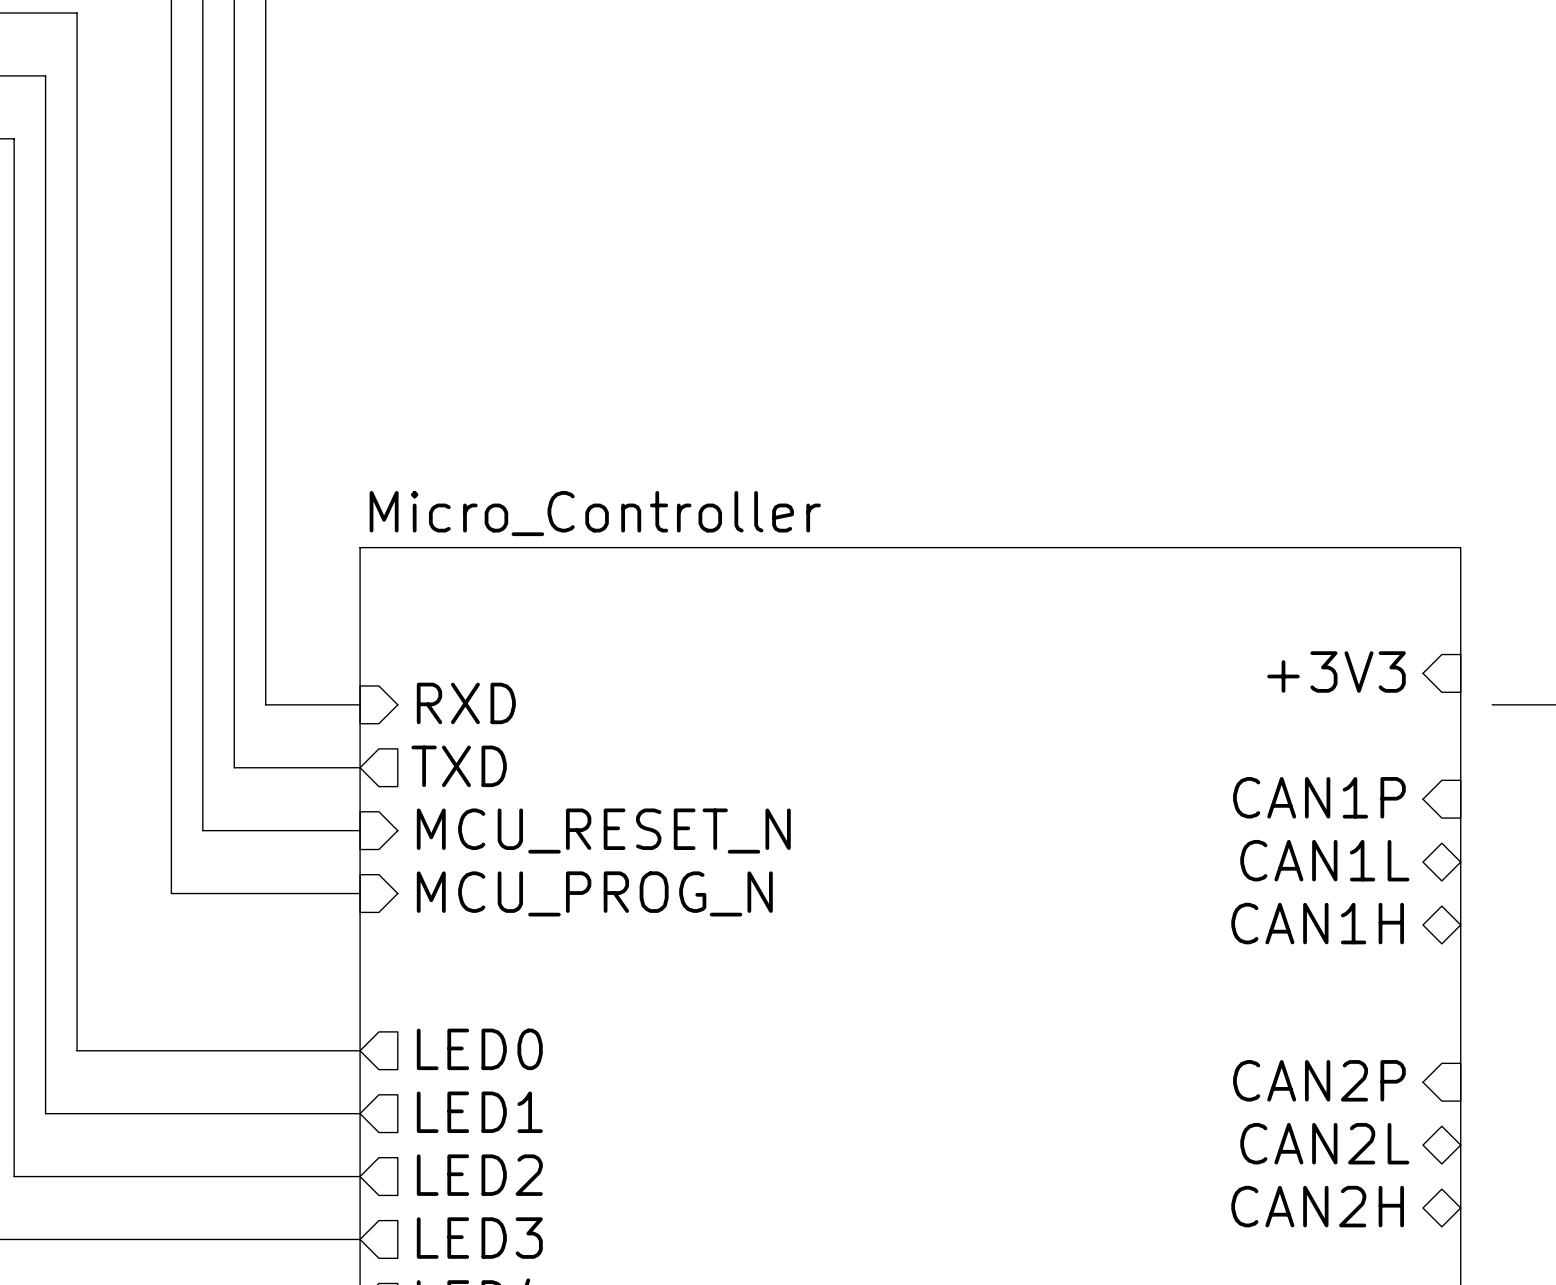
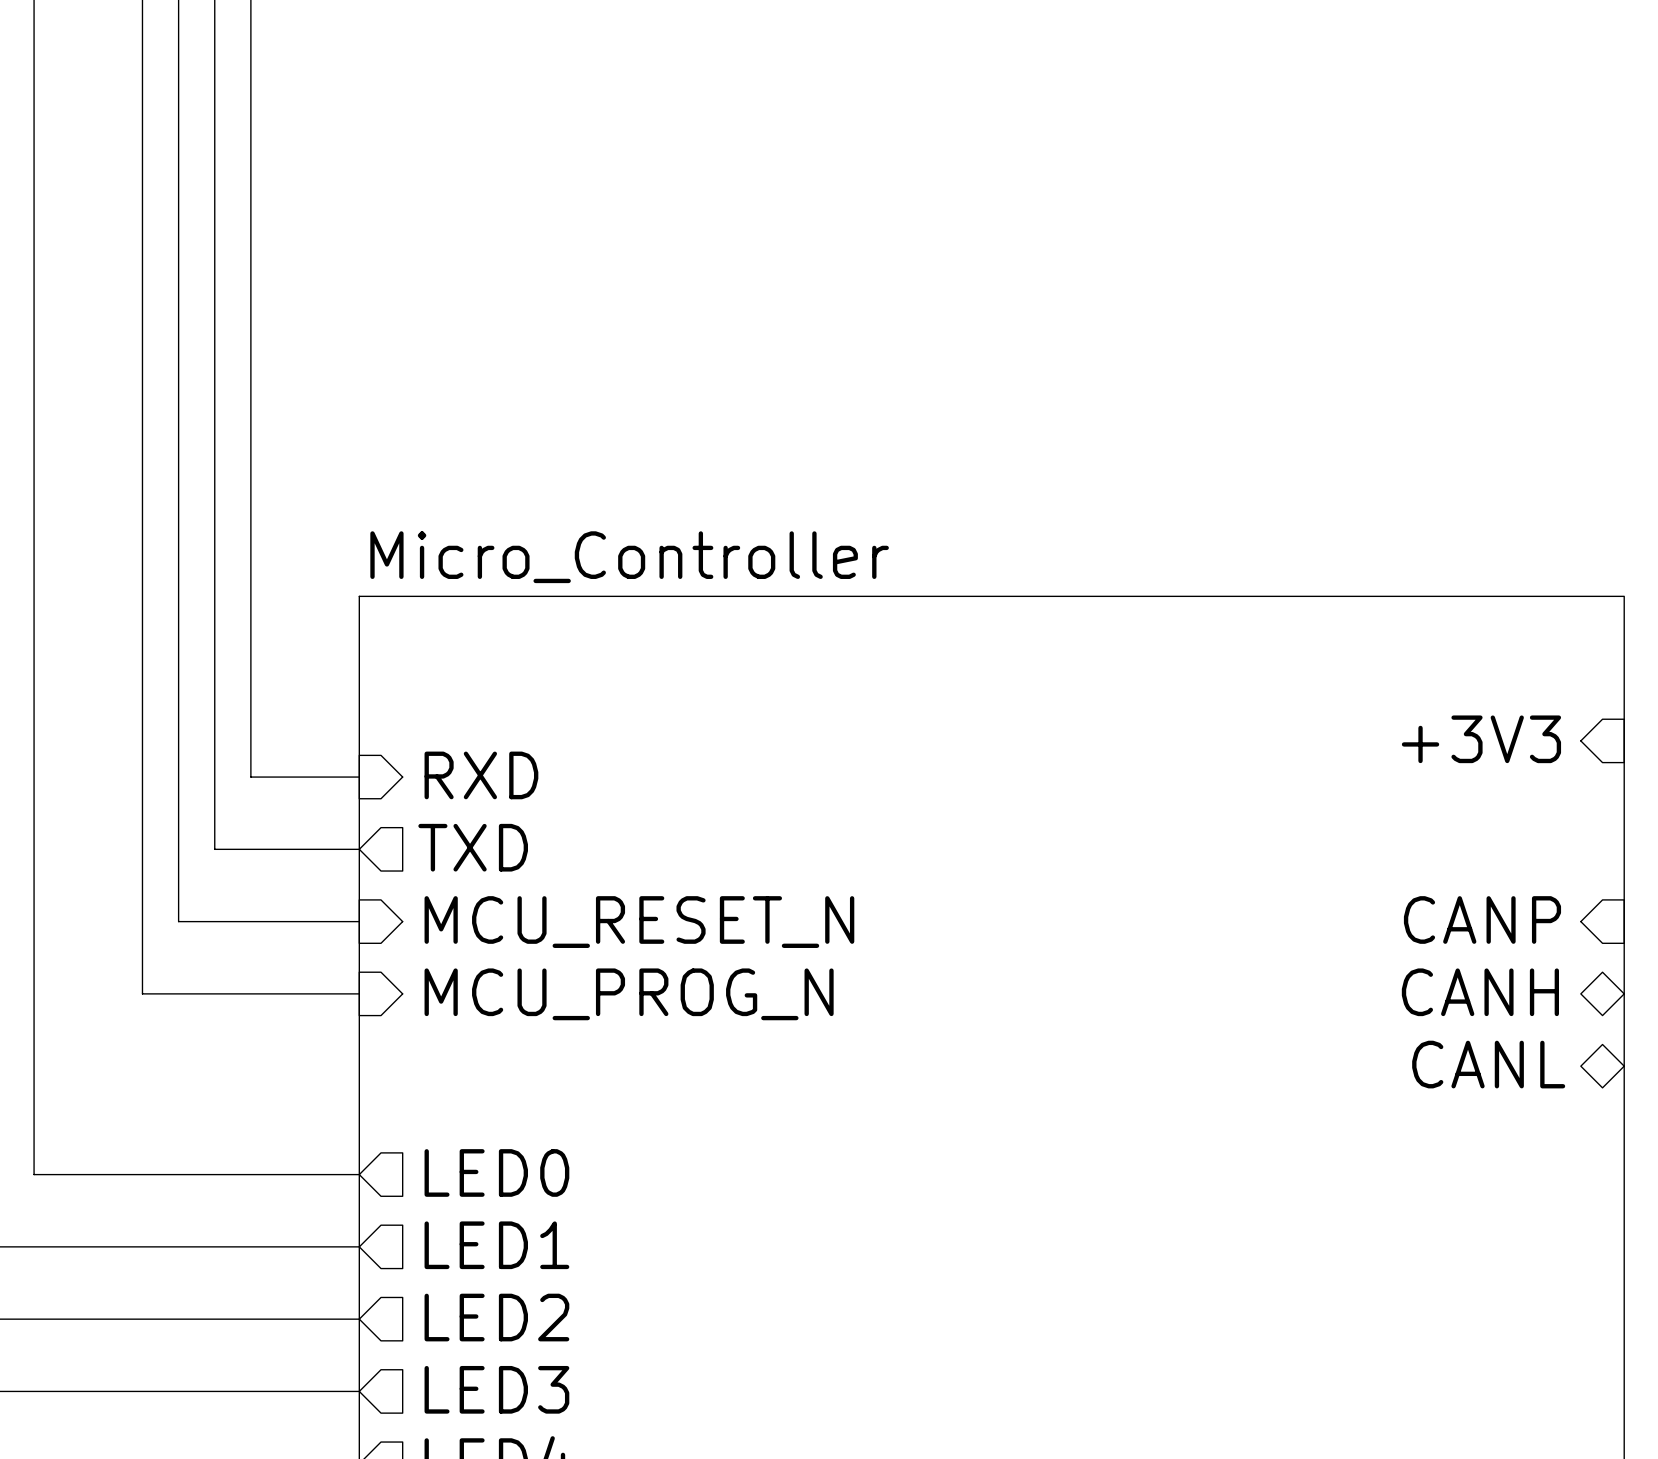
sheet pin: CAN1P (1319, 797) -> none
sheet pin: none -> CANP (1482, 919)
sheet pin: CAN1L (1324, 860) -> none
sheet pin: none -> CANH (1480, 992)
sheet pin: CAN1H (1317, 923) -> none
sheet pin: none -> CANL (1488, 1064)
sheet pin: CAN2P (1319, 1080) -> none
sheet pin: CAN2L (1324, 1143) -> none
sheet pin: CAN2H (1317, 1206) -> none

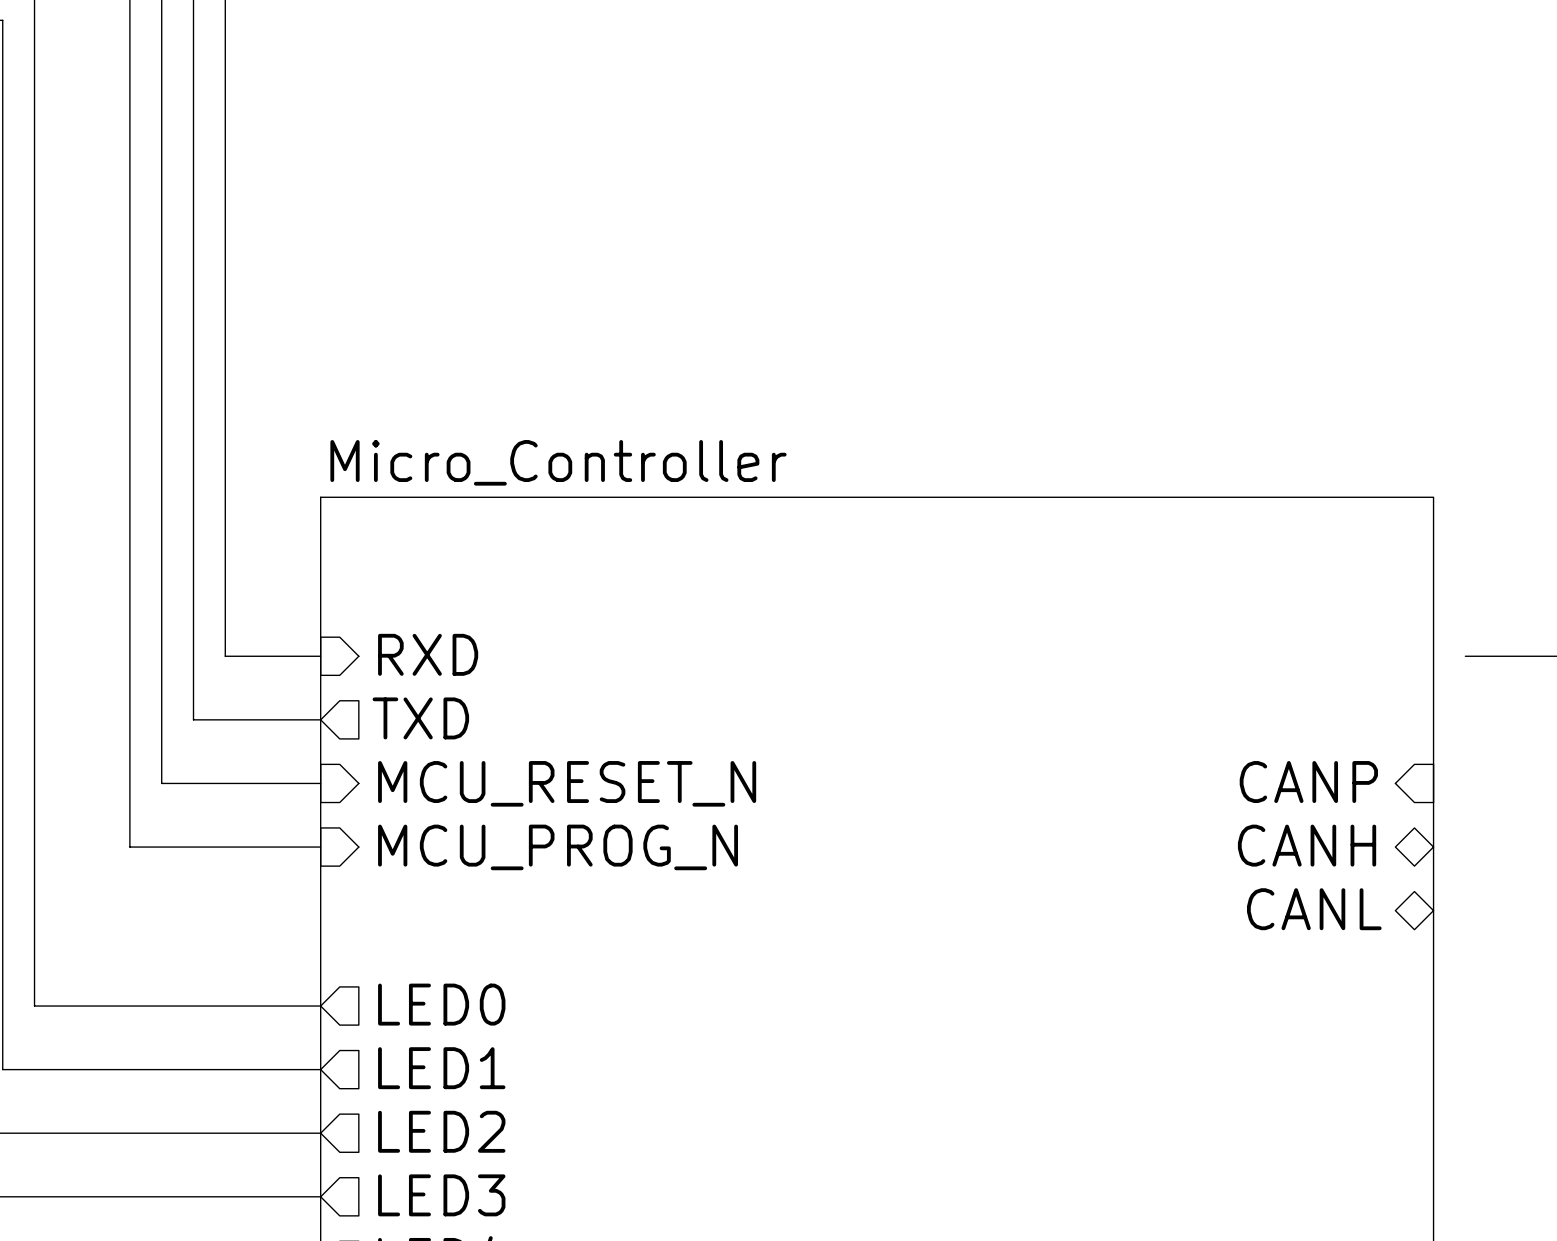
sheet pin: +3V3 (1481, 739) -> none

